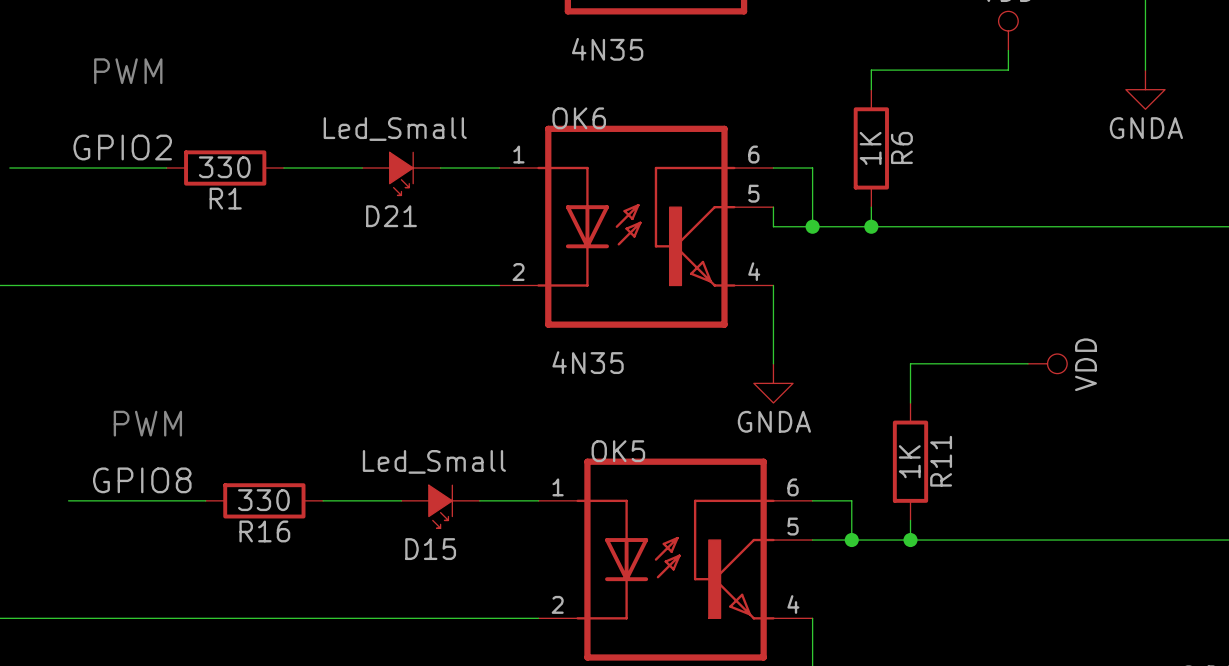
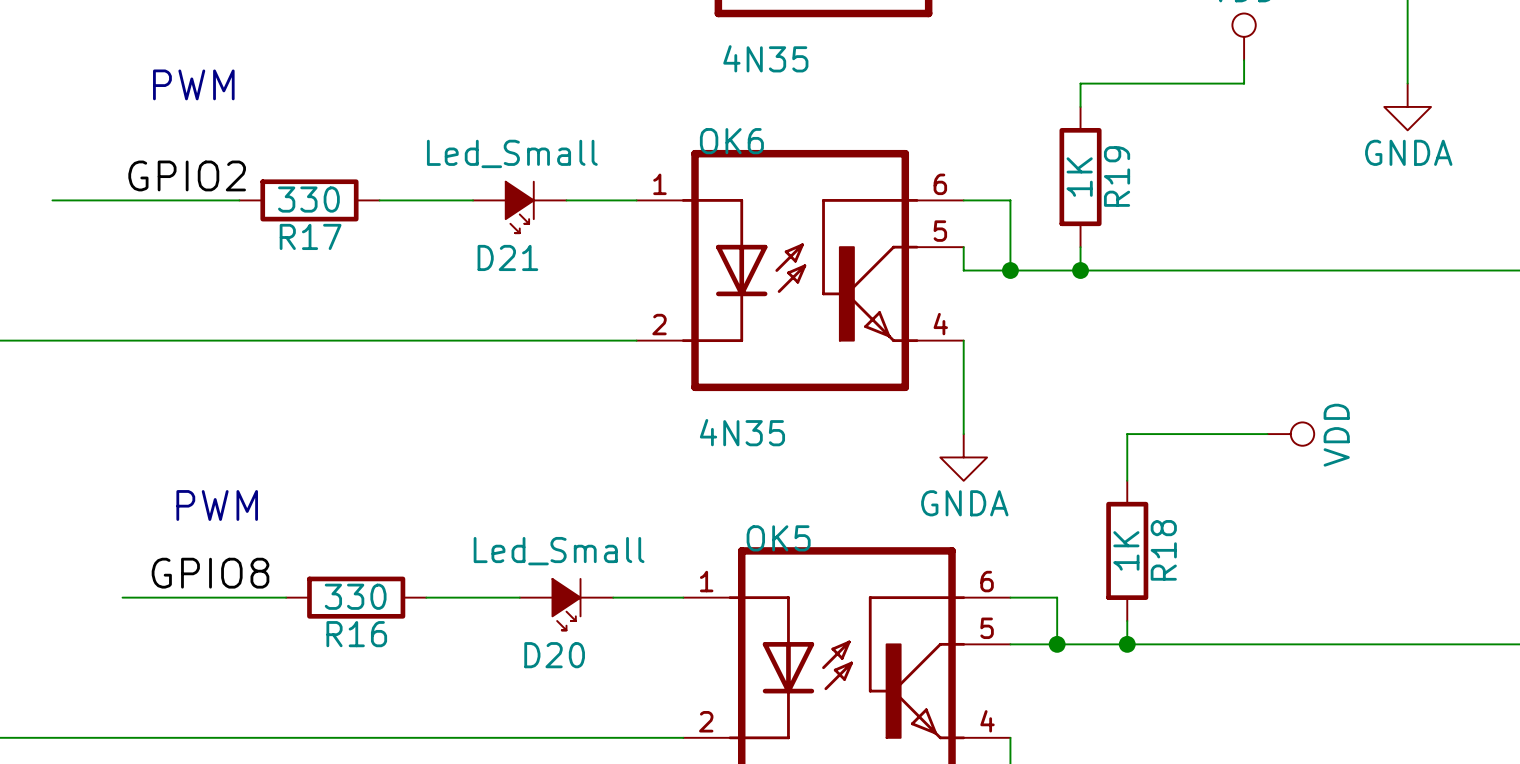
R6 name: R6 (901, 147) -> R19 (1117, 176)
R1 name: R1 (225, 198) -> R17 (310, 236)
R11 name: R11 (941, 461) -> R18 (1163, 550)
D15 name: D15 (430, 549) -> D20 (554, 655)

